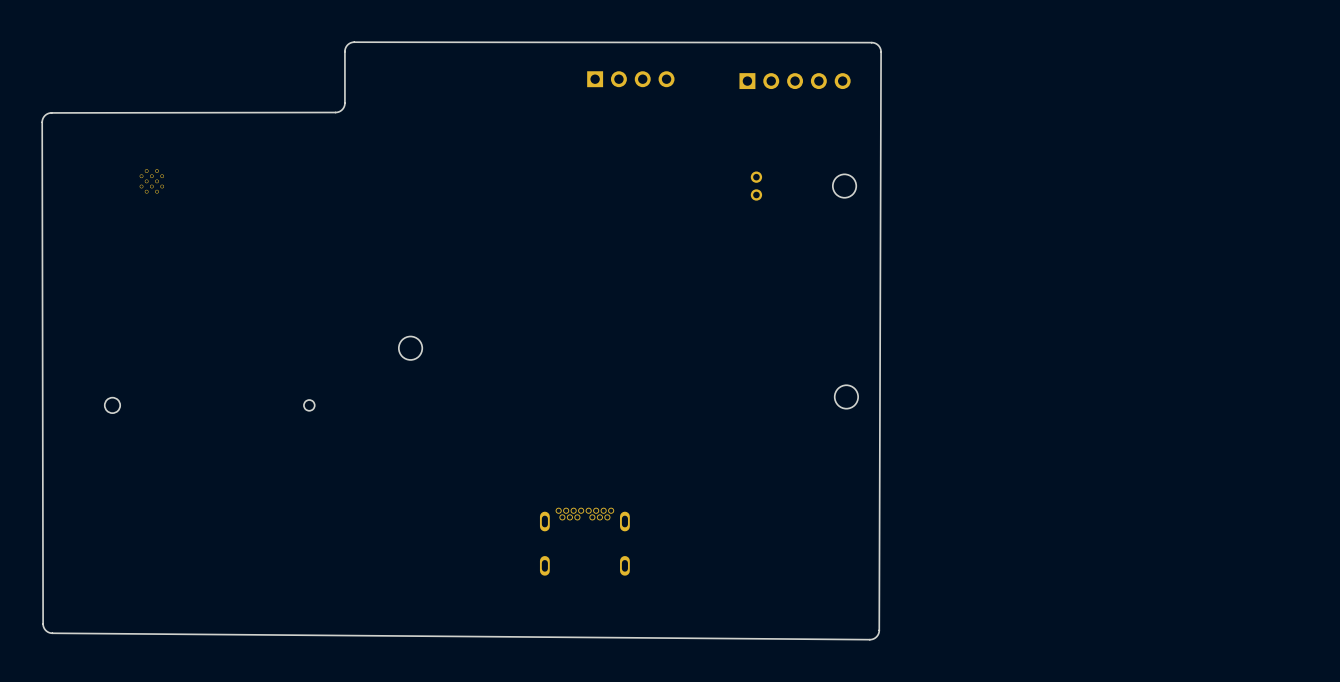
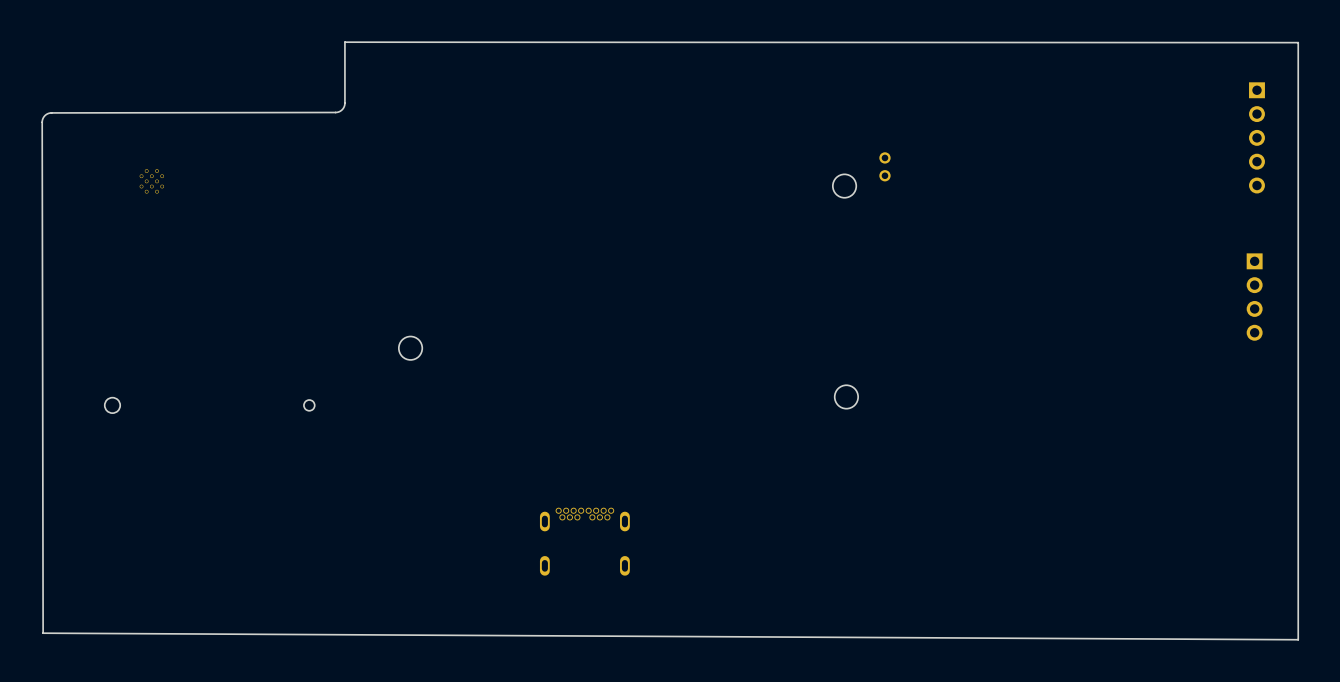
board edge: (344, 51) (347, 44) (354, 42) (871, 42) (878, 45) (881, 52) (878, 634) (869, 639) (52, 633) (45, 630) (43, 623) -> (344, 51) (344, 42) (1298, 42) (1298, 639) (43, 633) (43, 623)
part: (630, 79) -> none
part: (795, 81) -> none
part: none -> (1256, 137)
part position: (756, 186) -> (884, 166)
part: none -> (1254, 297)

